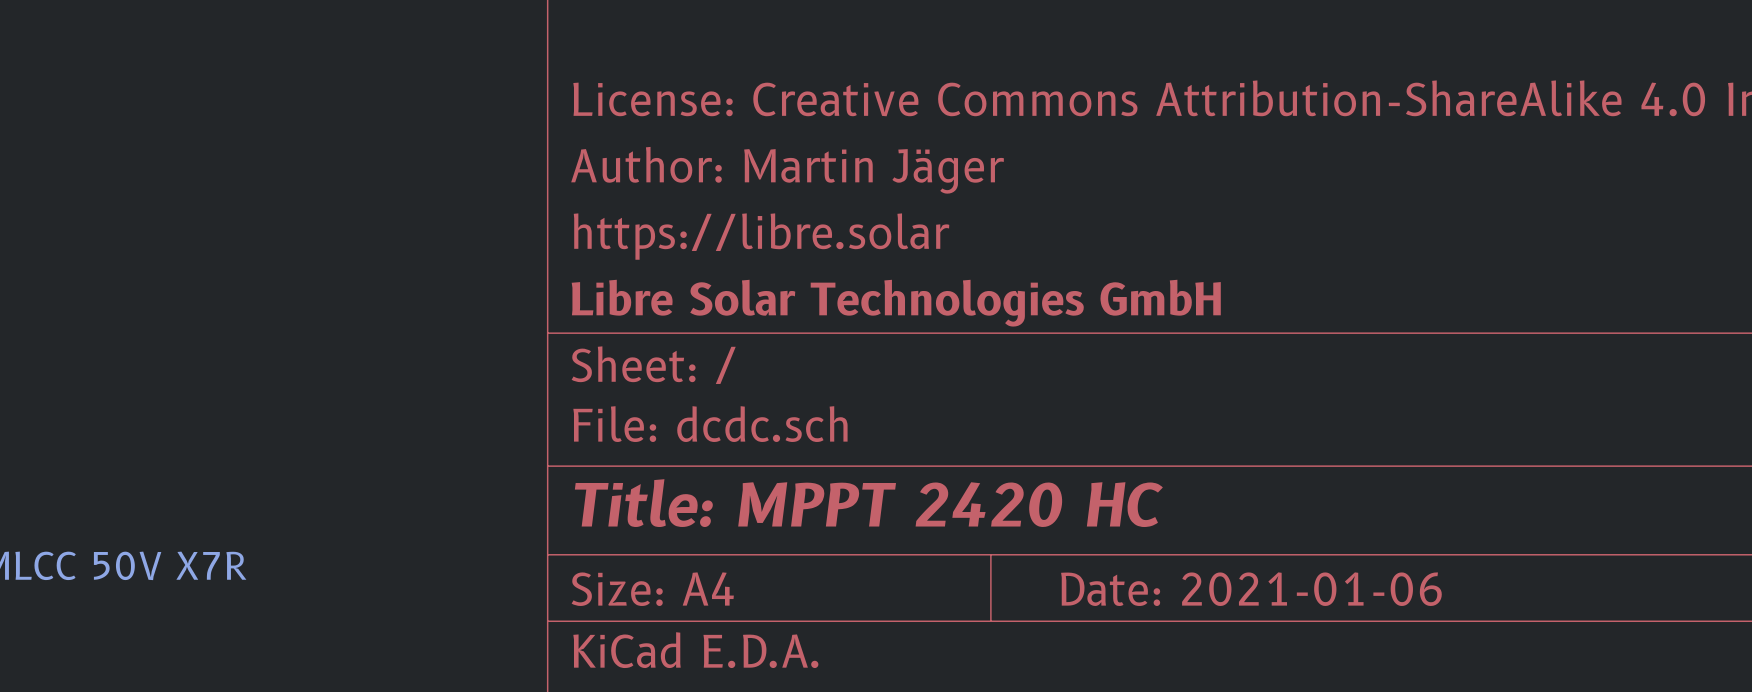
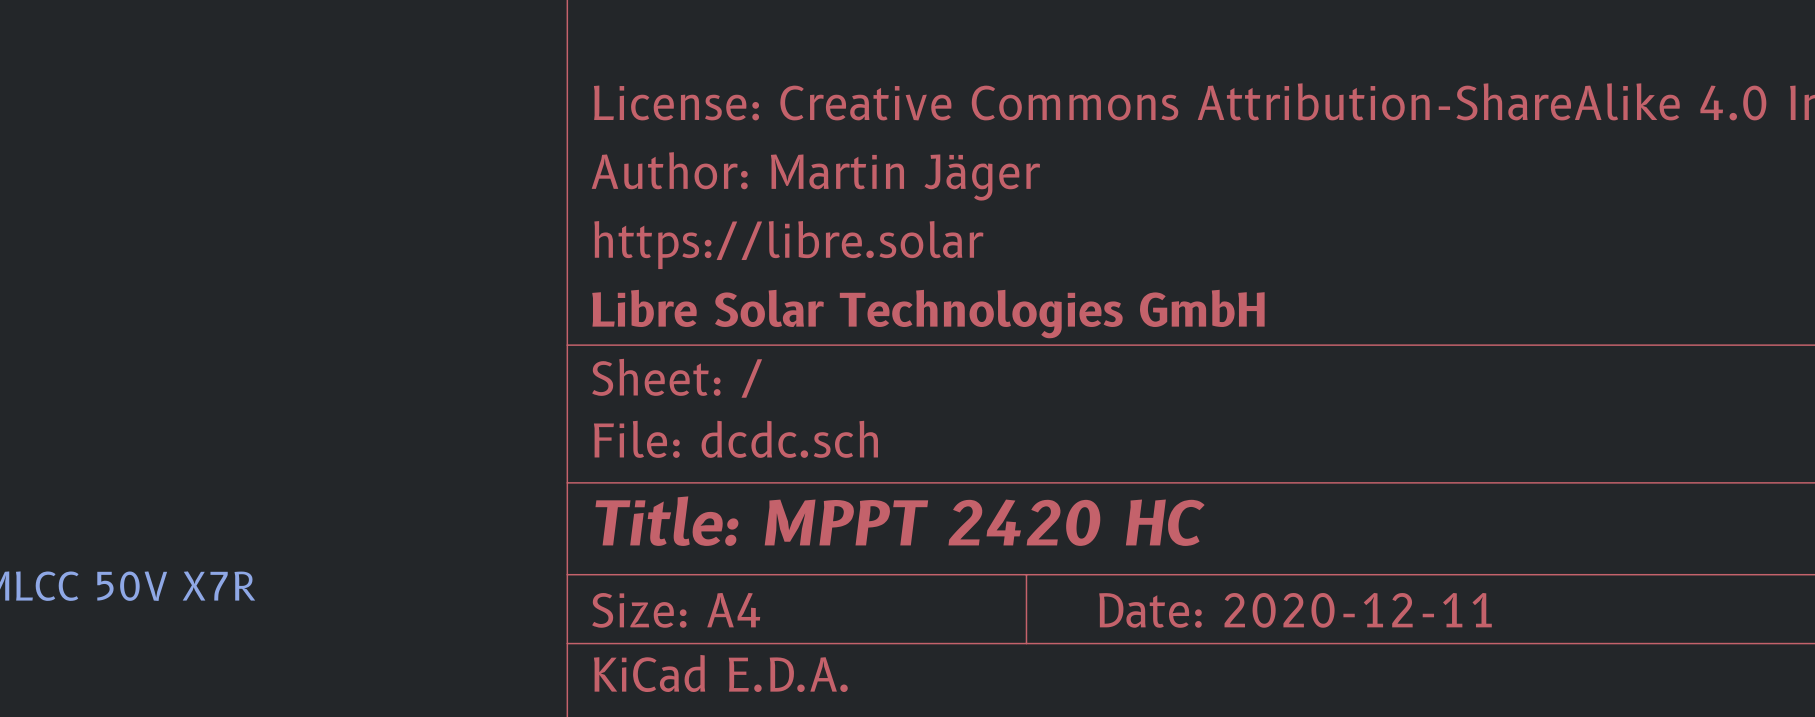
title block: Date: 2021-01-06 (1251, 589) -> Date: 2020-12-11 (1295, 610)

